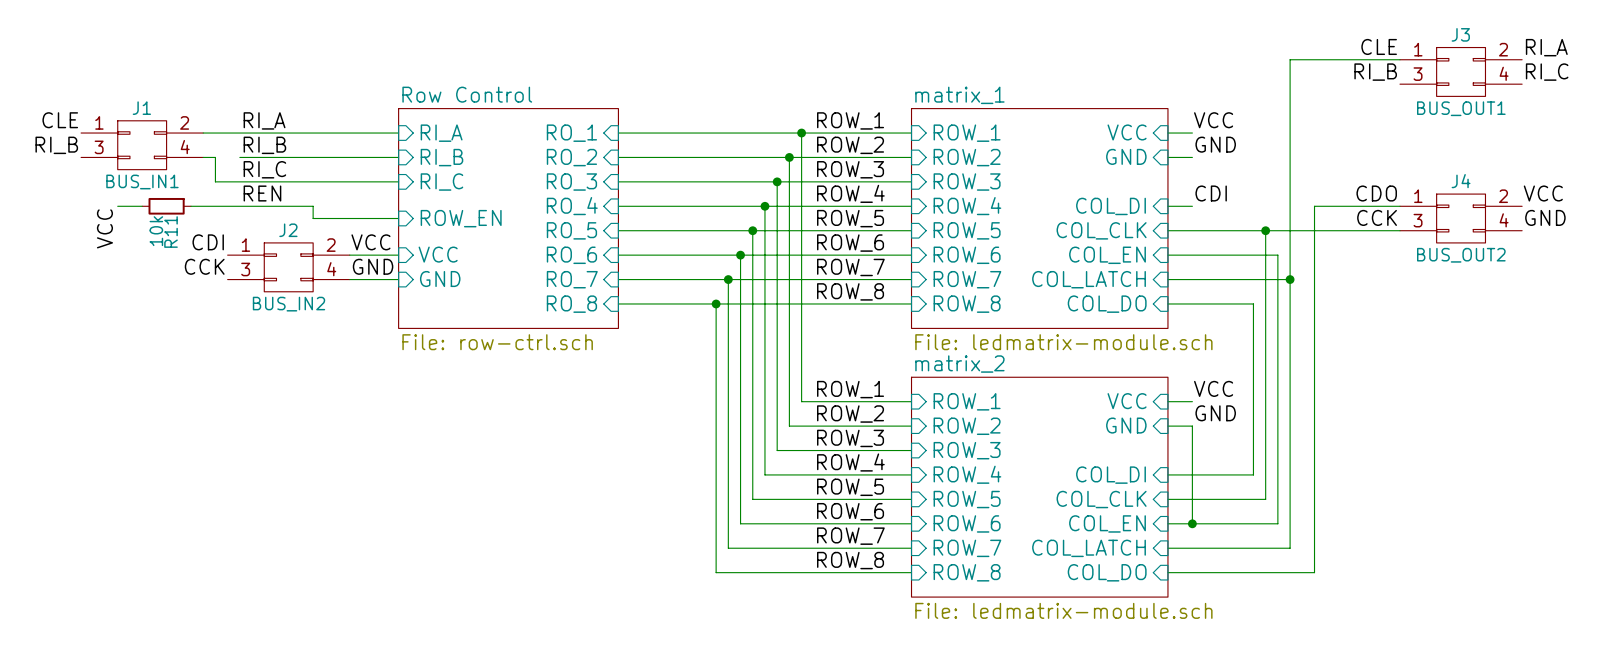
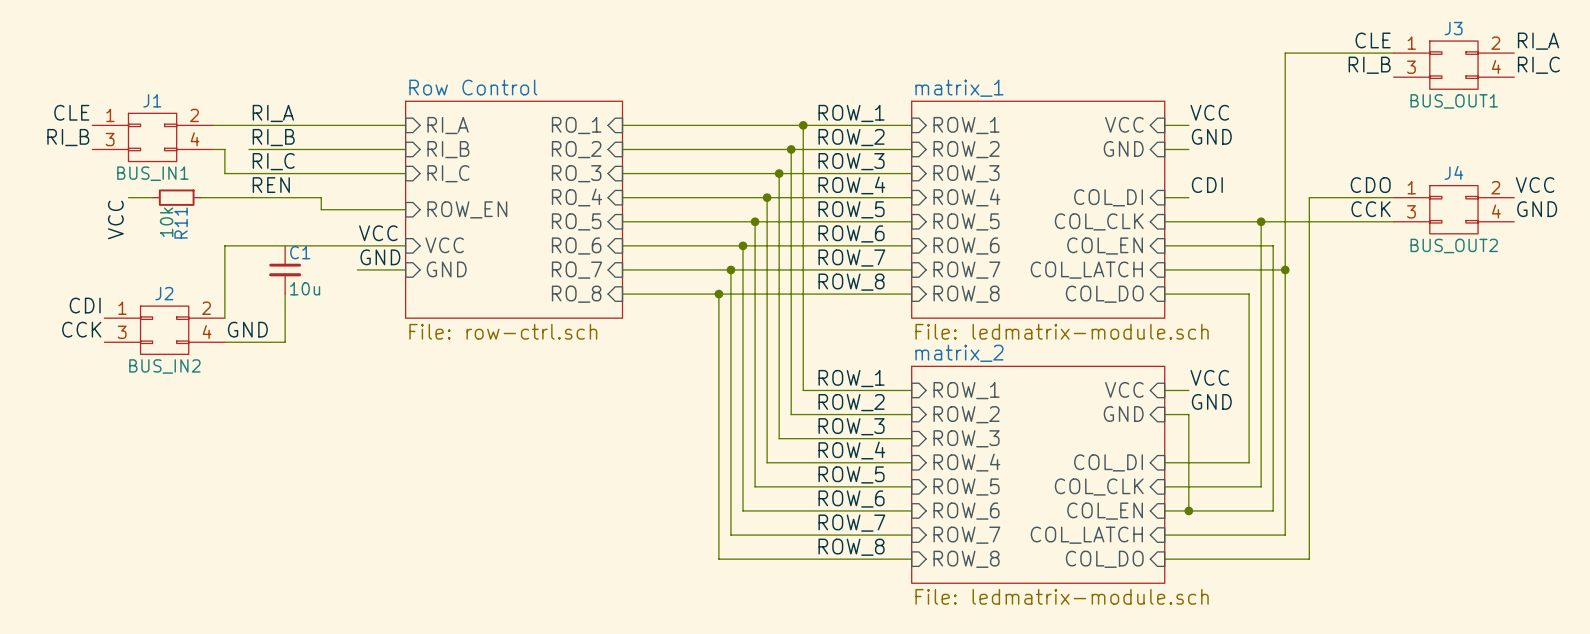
label position: CDI (208, 242) -> CDI (85, 305)
wire: none -> (357, 245) (224, 245) (224, 318)
label position: CCK (204, 266) -> CCK (81, 329)
J2 position: (288, 267) -> (164, 330)
C1: none -> 10u (285, 269)
wire: none -> (285, 294) (285, 342) (224, 342)
label: none -> GND (247, 329)

